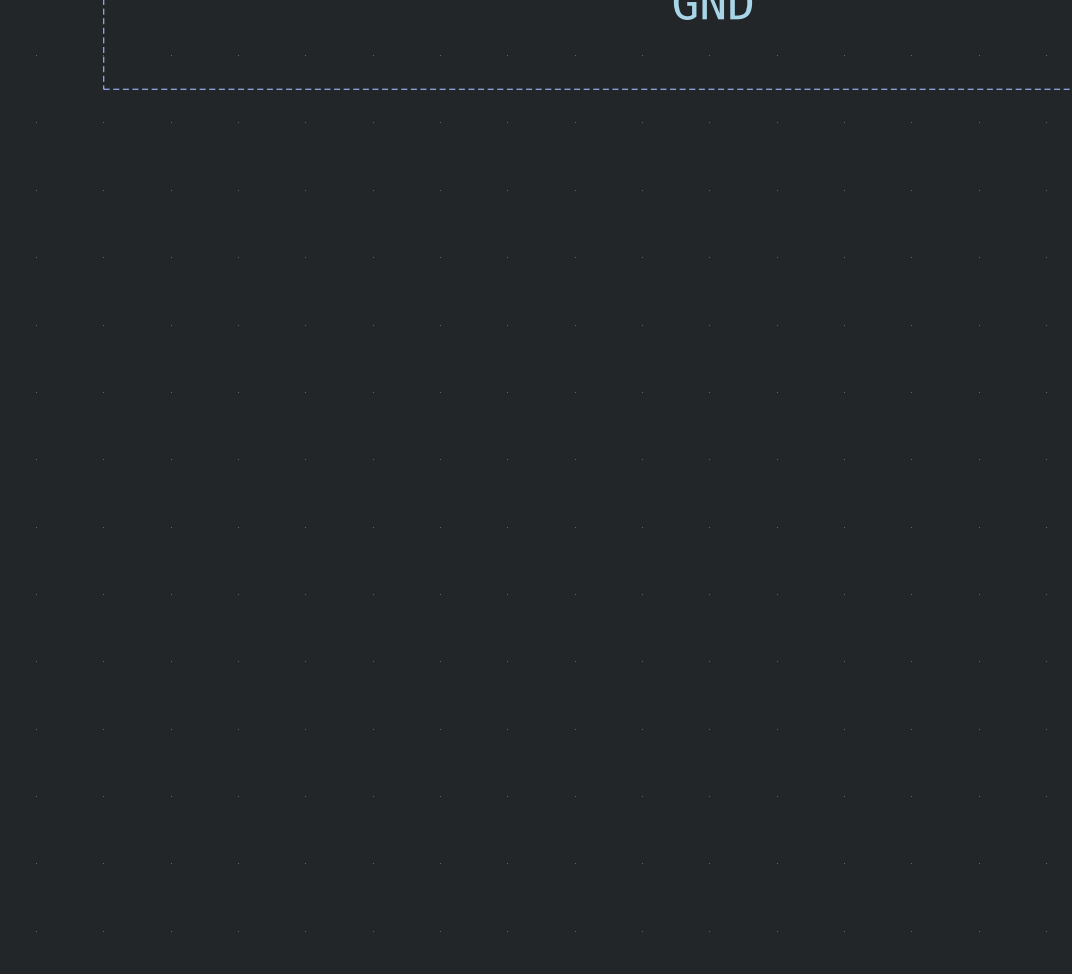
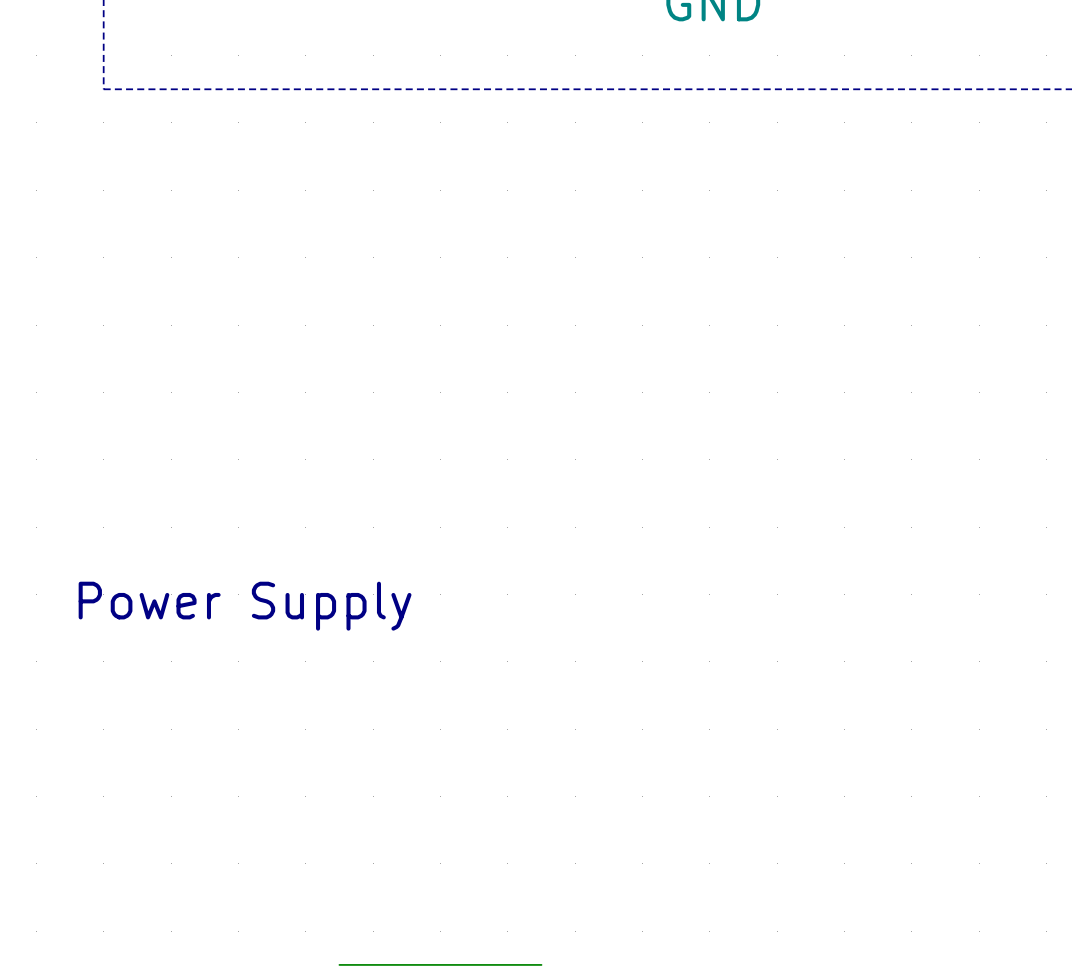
text: none -> Power Supply (245, 606)
wire: none -> (339, 964) (541, 964)

